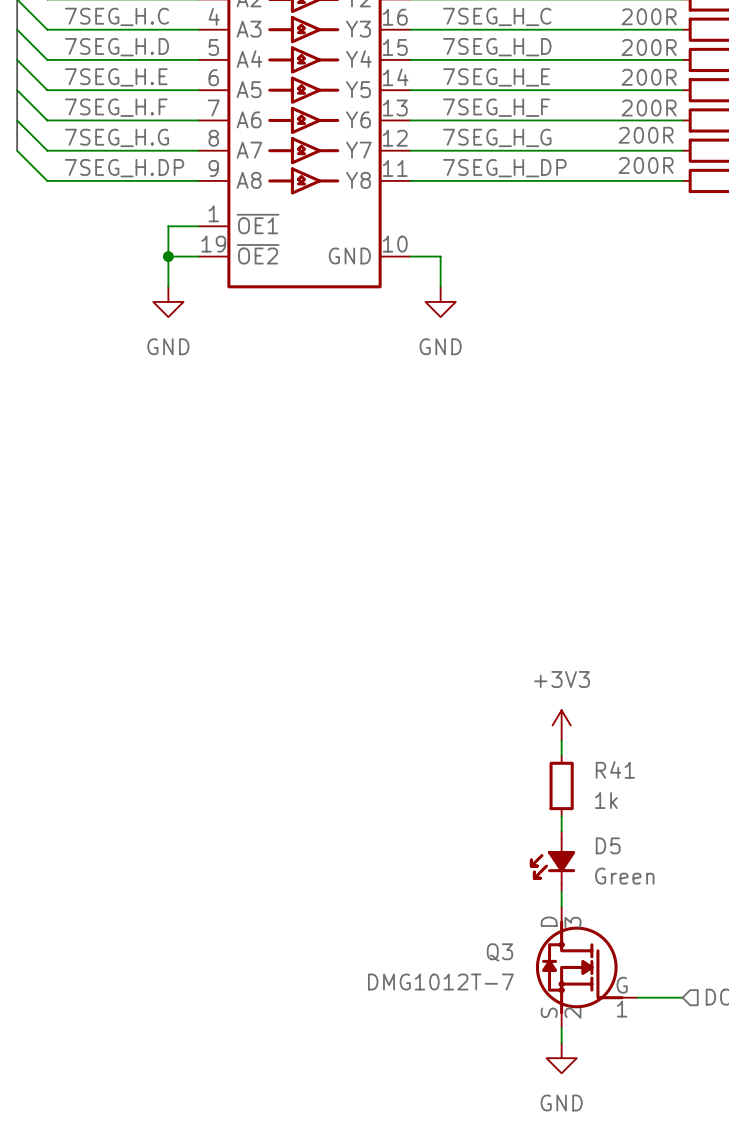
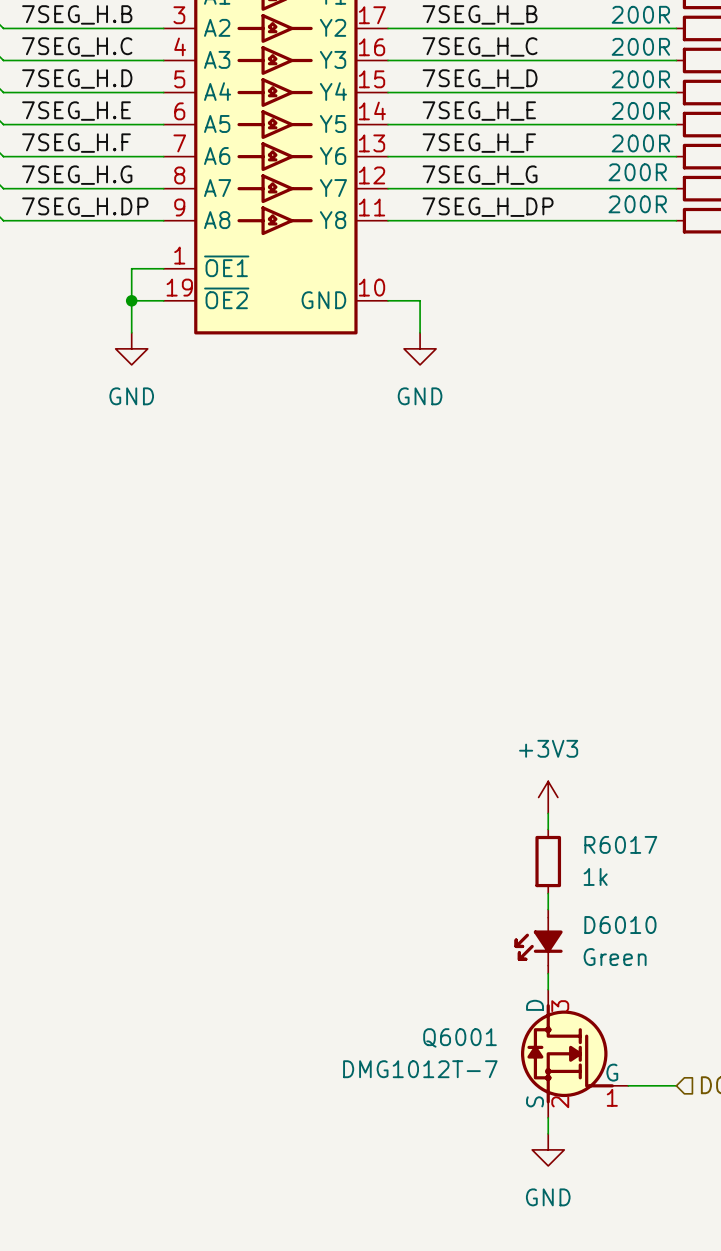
R41 name: R41 (615, 769) -> R6017 (620, 844)
D5 name: D5 (608, 845) -> D6010 (620, 925)
Q3 name: Q3 (499, 952) -> Q6001 (460, 1037)

